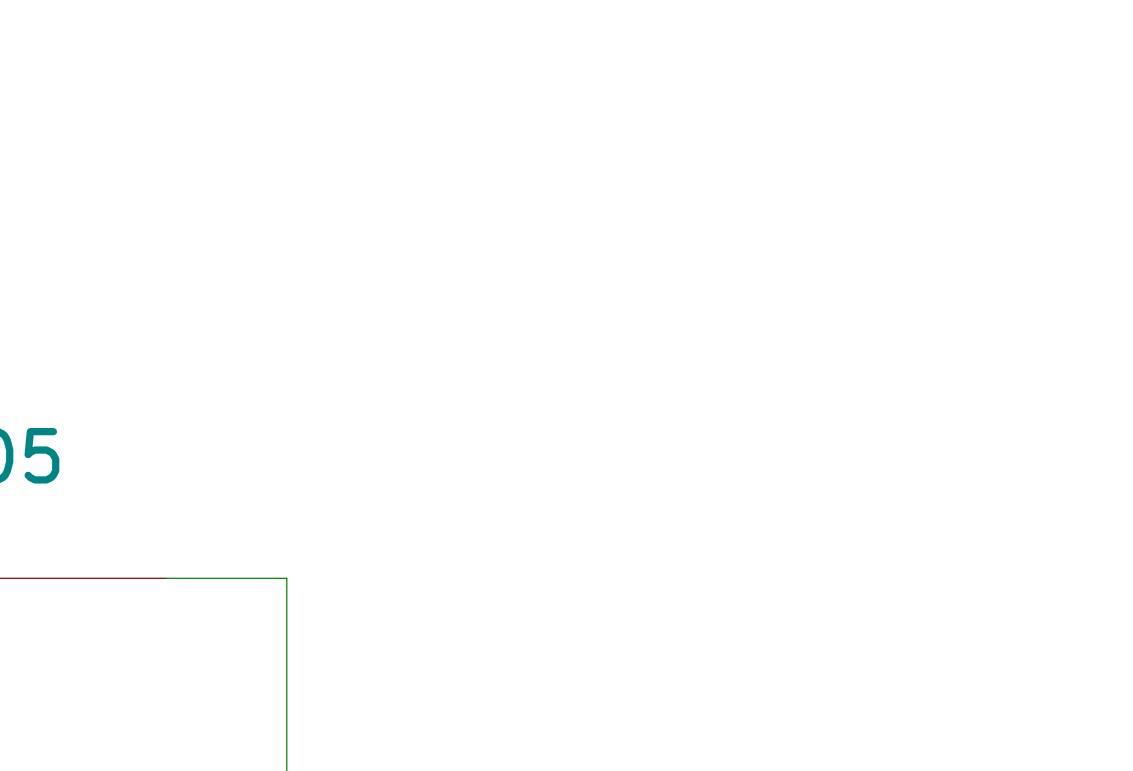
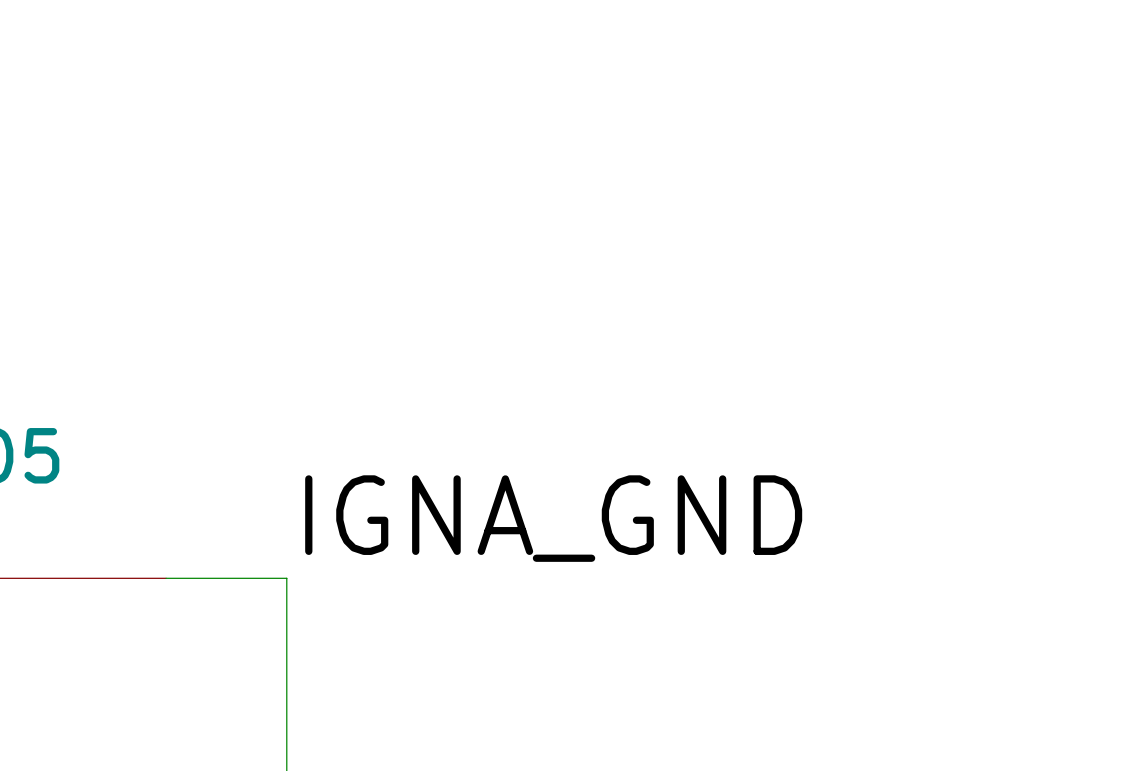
label: none -> IGNA_GND (553, 518)

